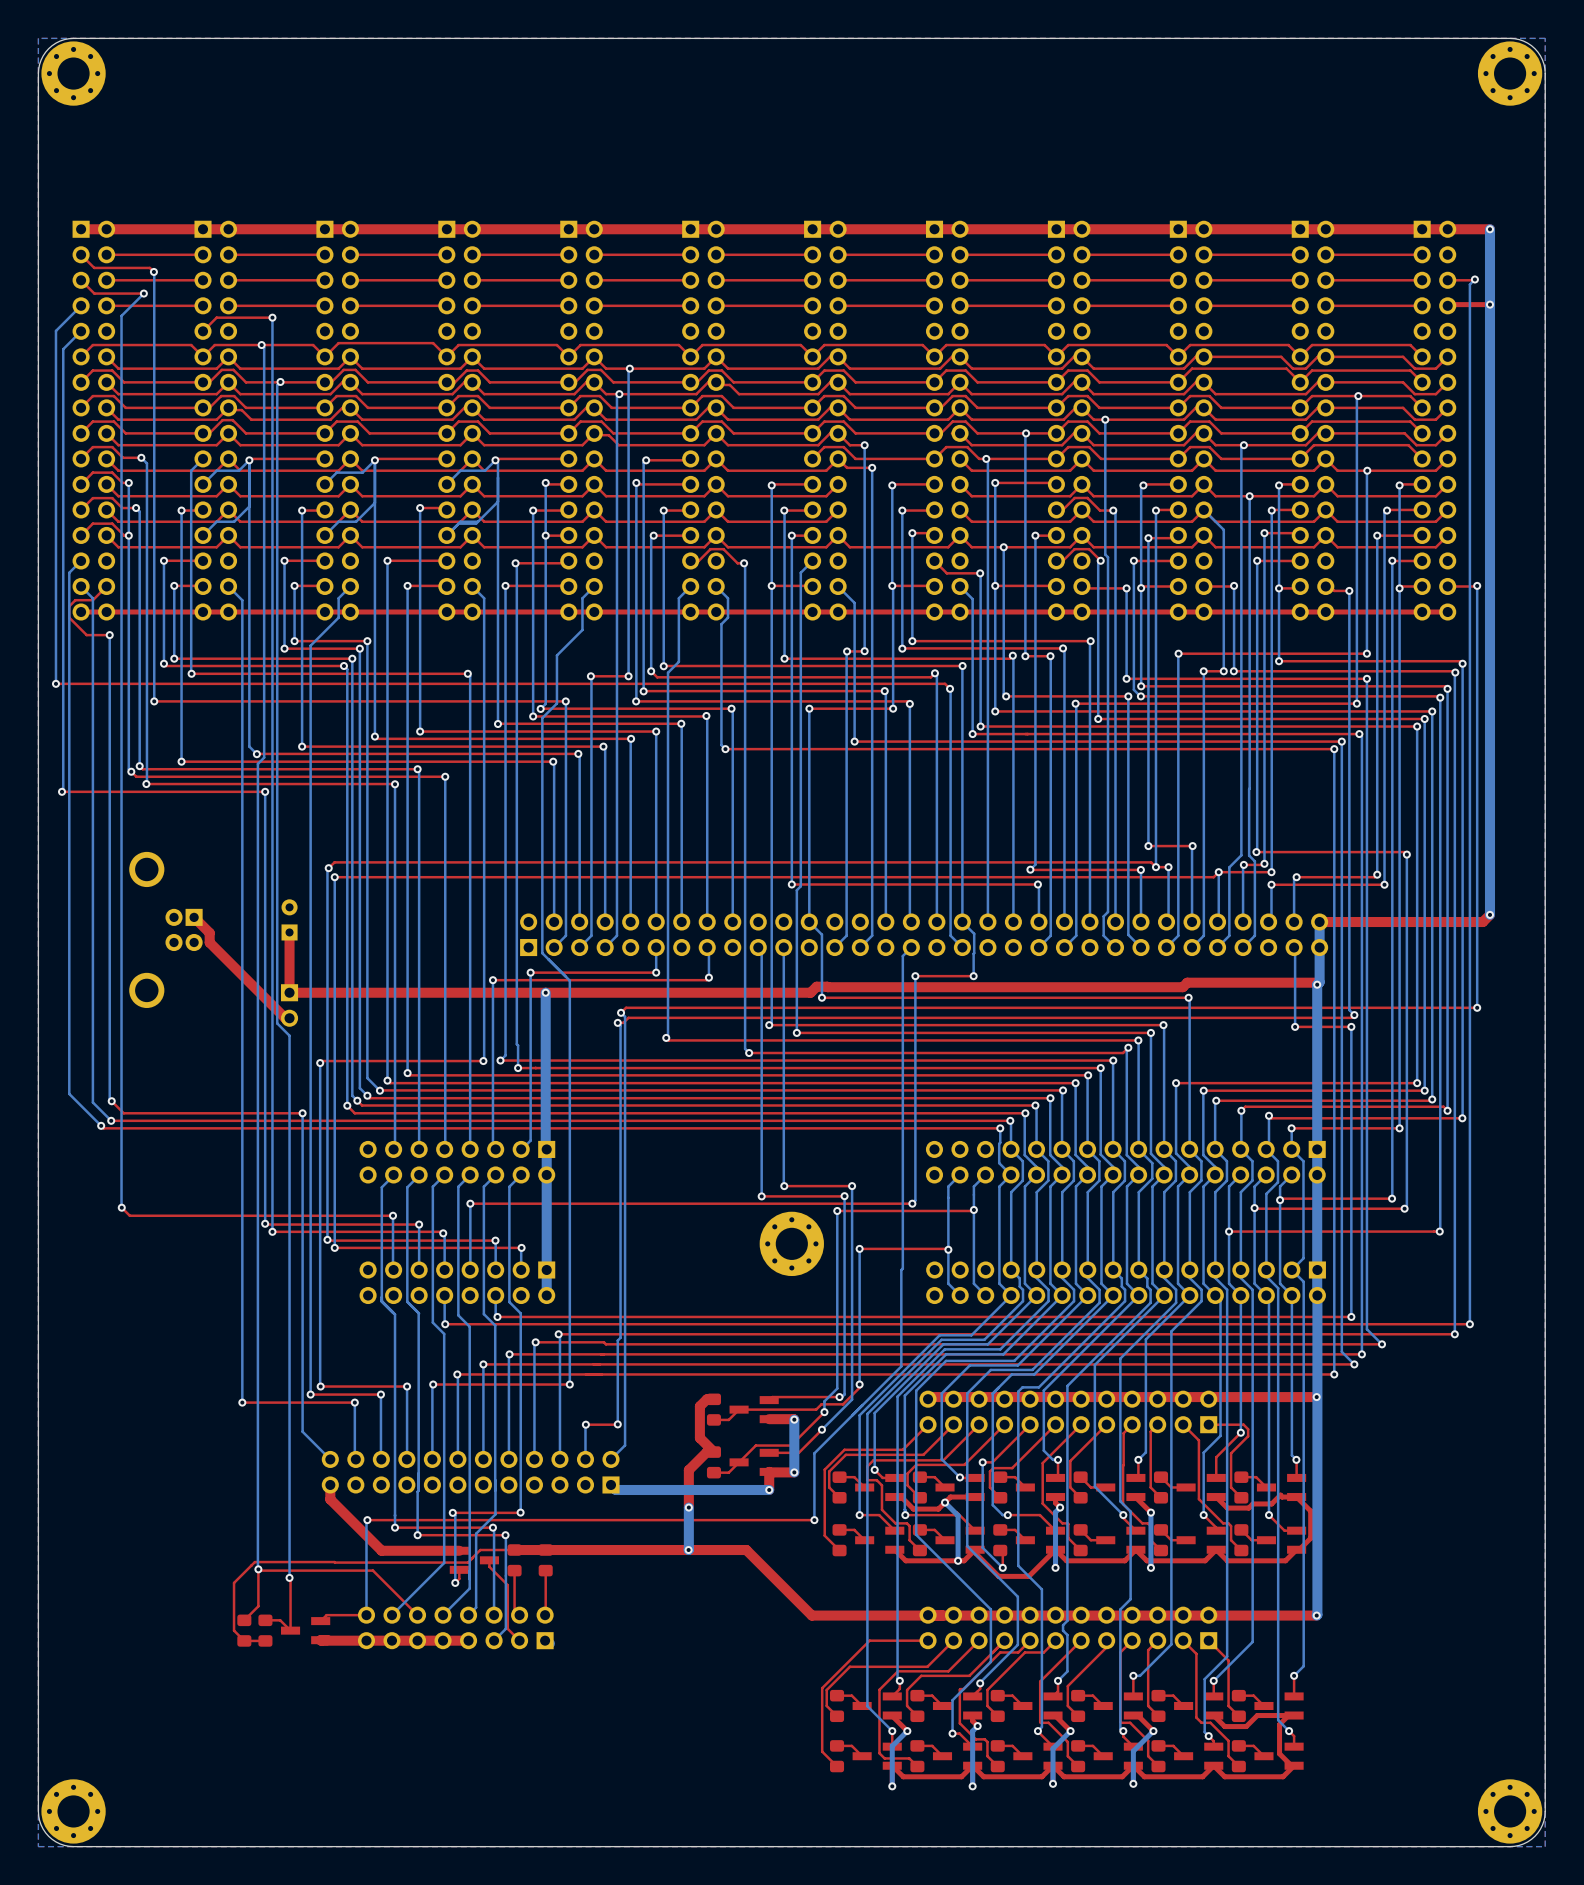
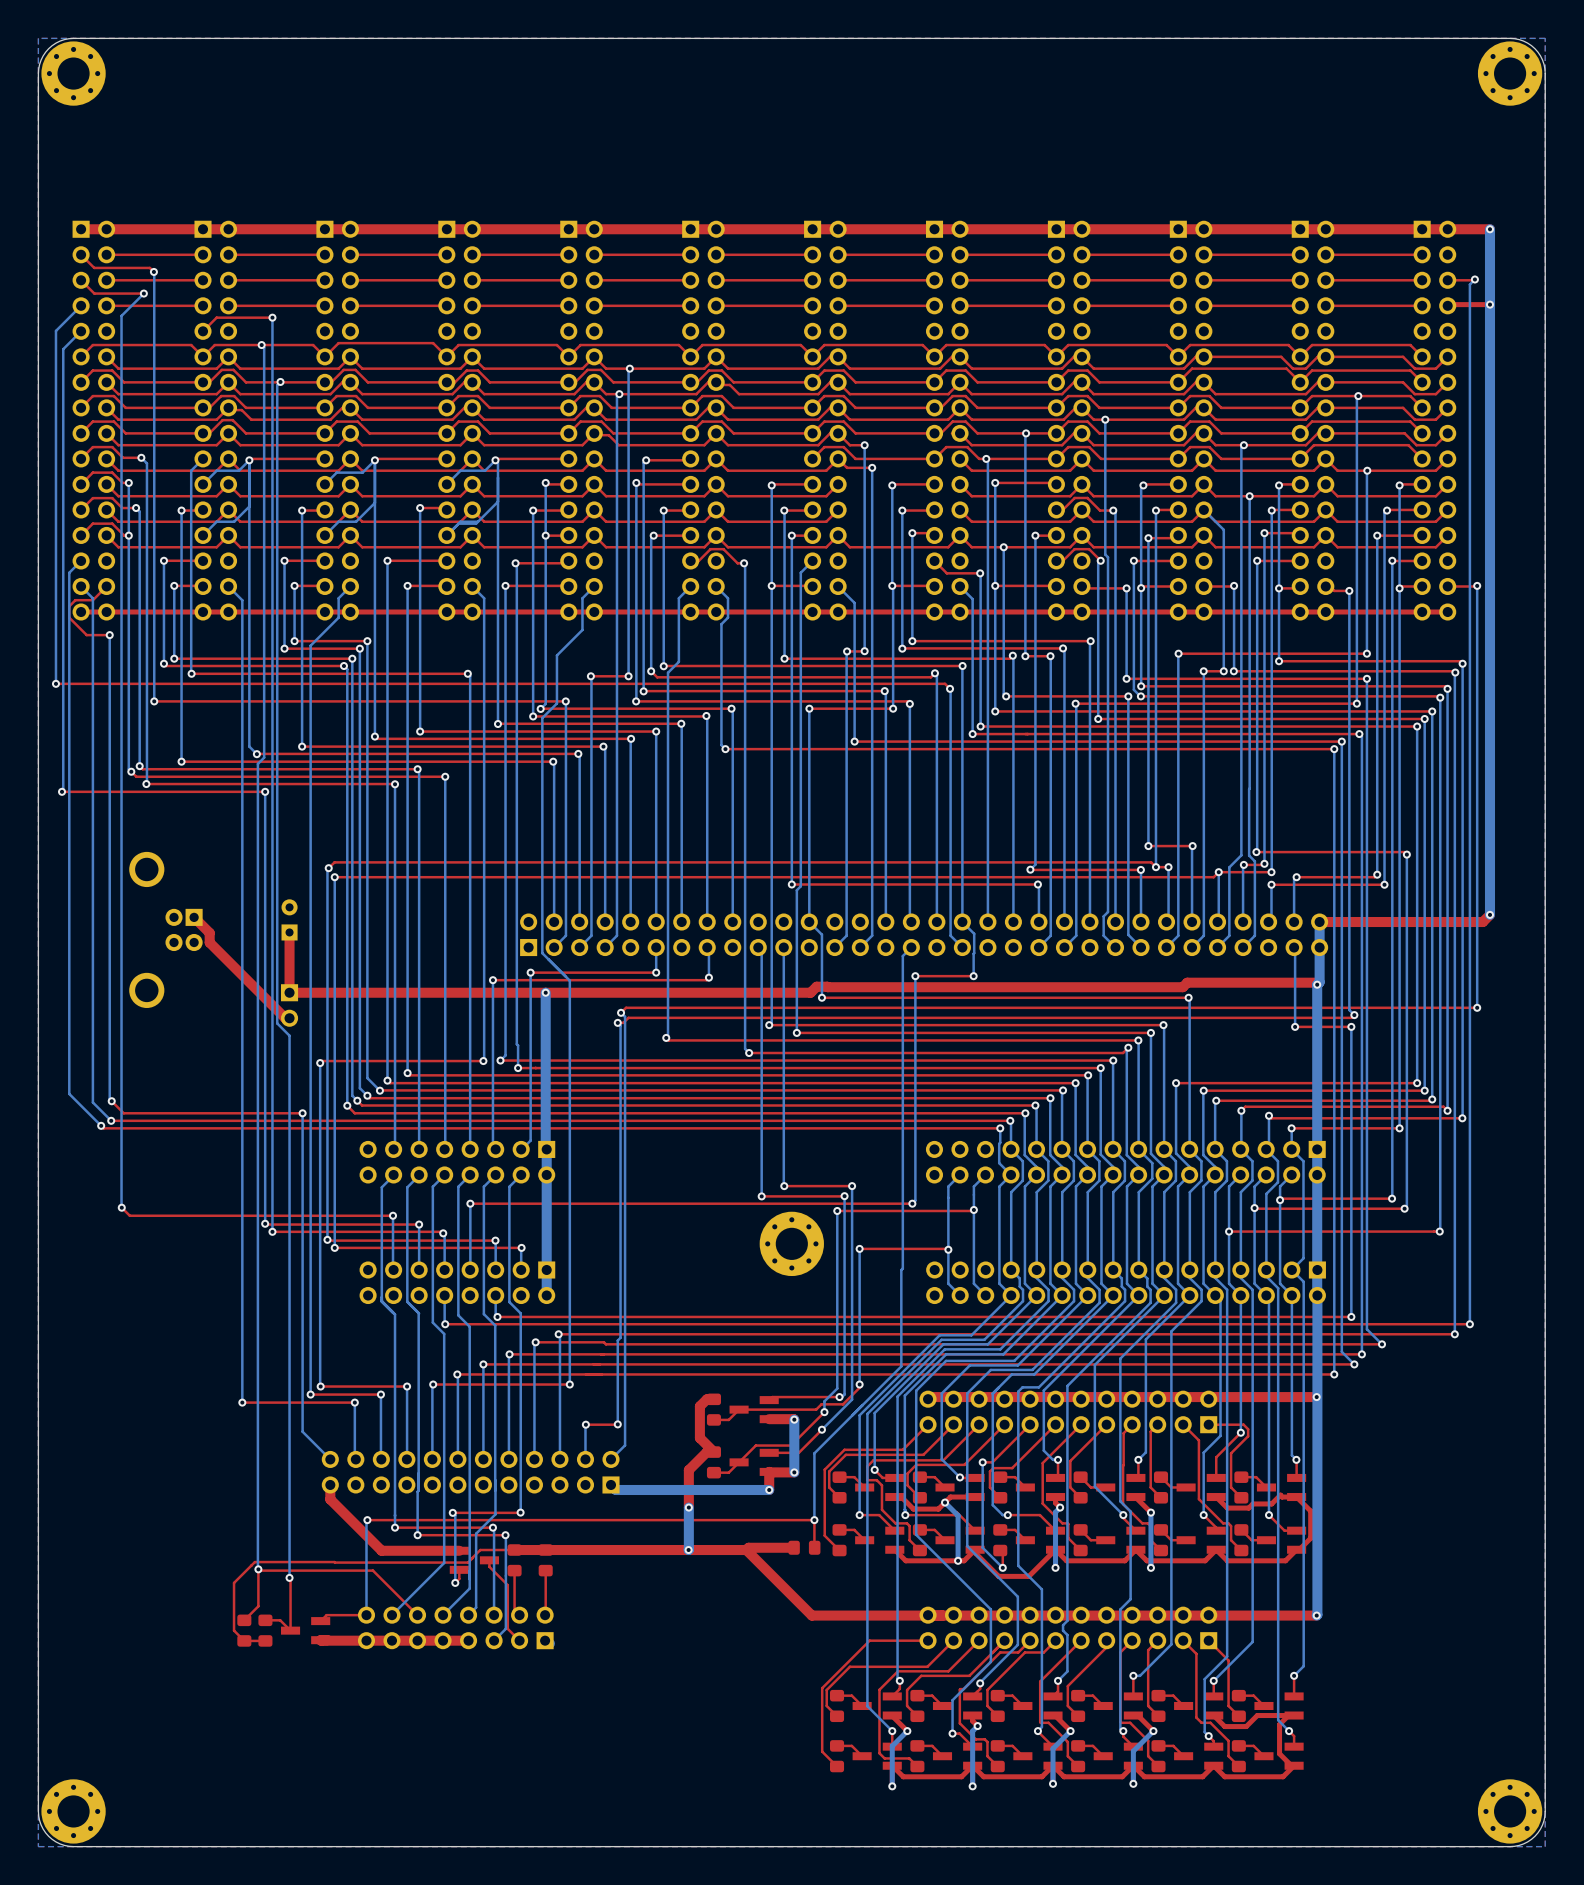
top track: none -> (814, 1520) (814, 1547)
top track: none -> (794, 1547) (748, 1547) (746, 1550)
part: none -> (804, 1547)

